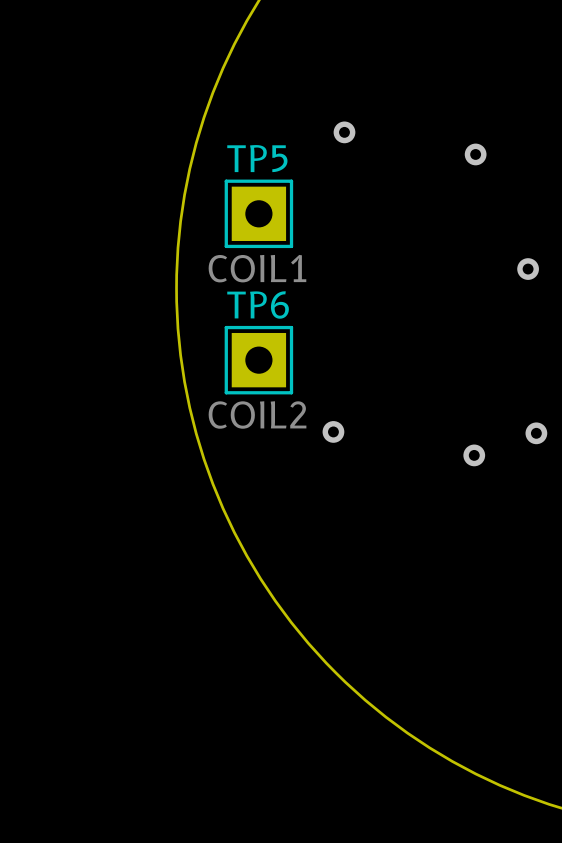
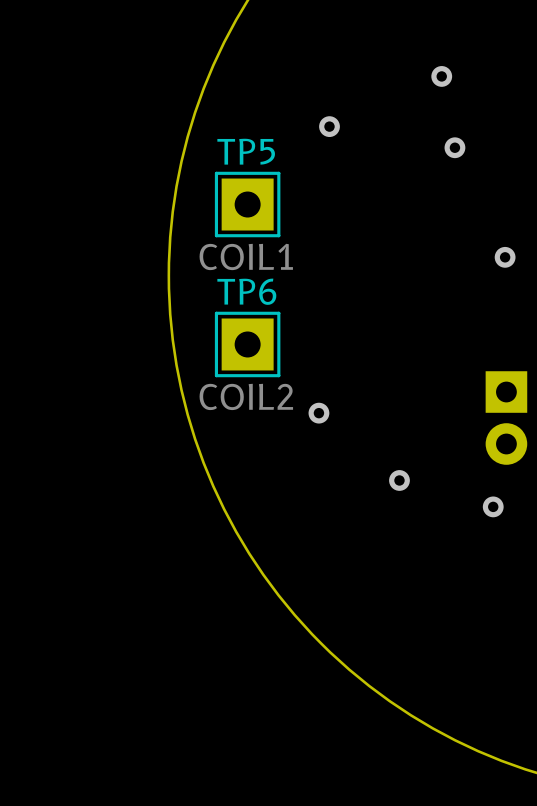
via: none -> (441, 76)
via: (536, 433) -> none
part: none -> (506, 418)
via: (474, 455) -> none
via: none -> (399, 480)
via: none -> (493, 506)

